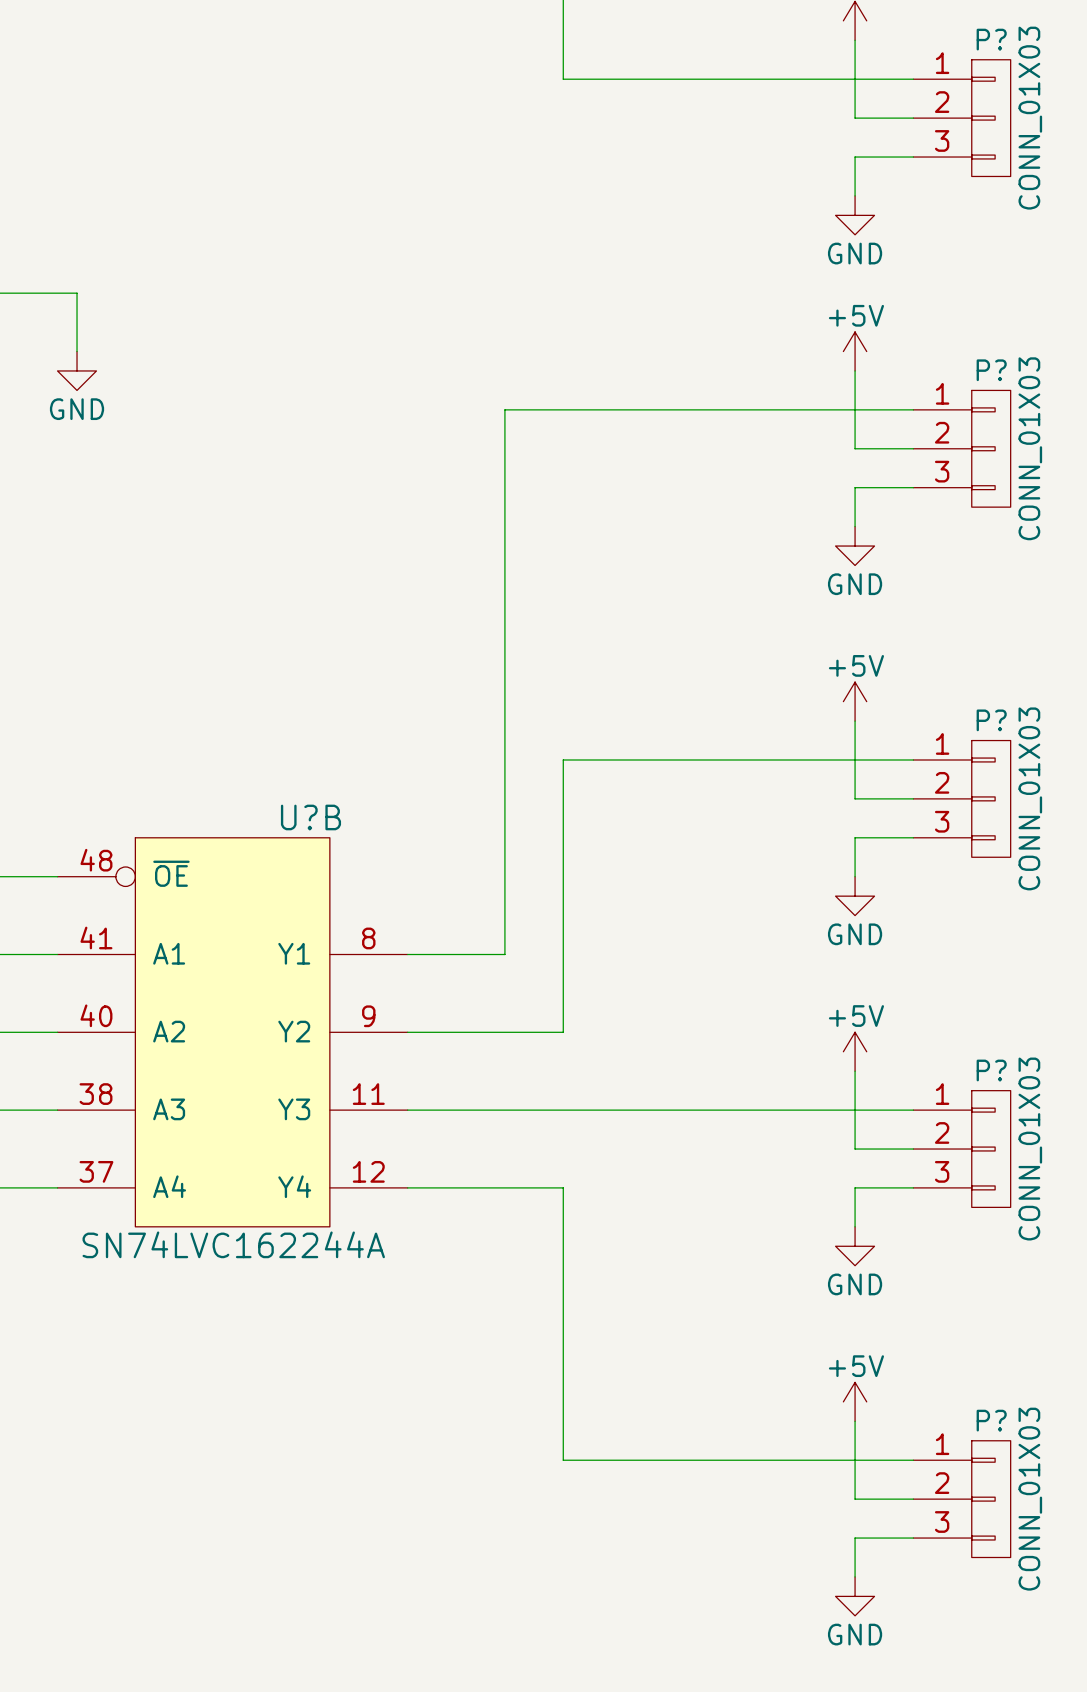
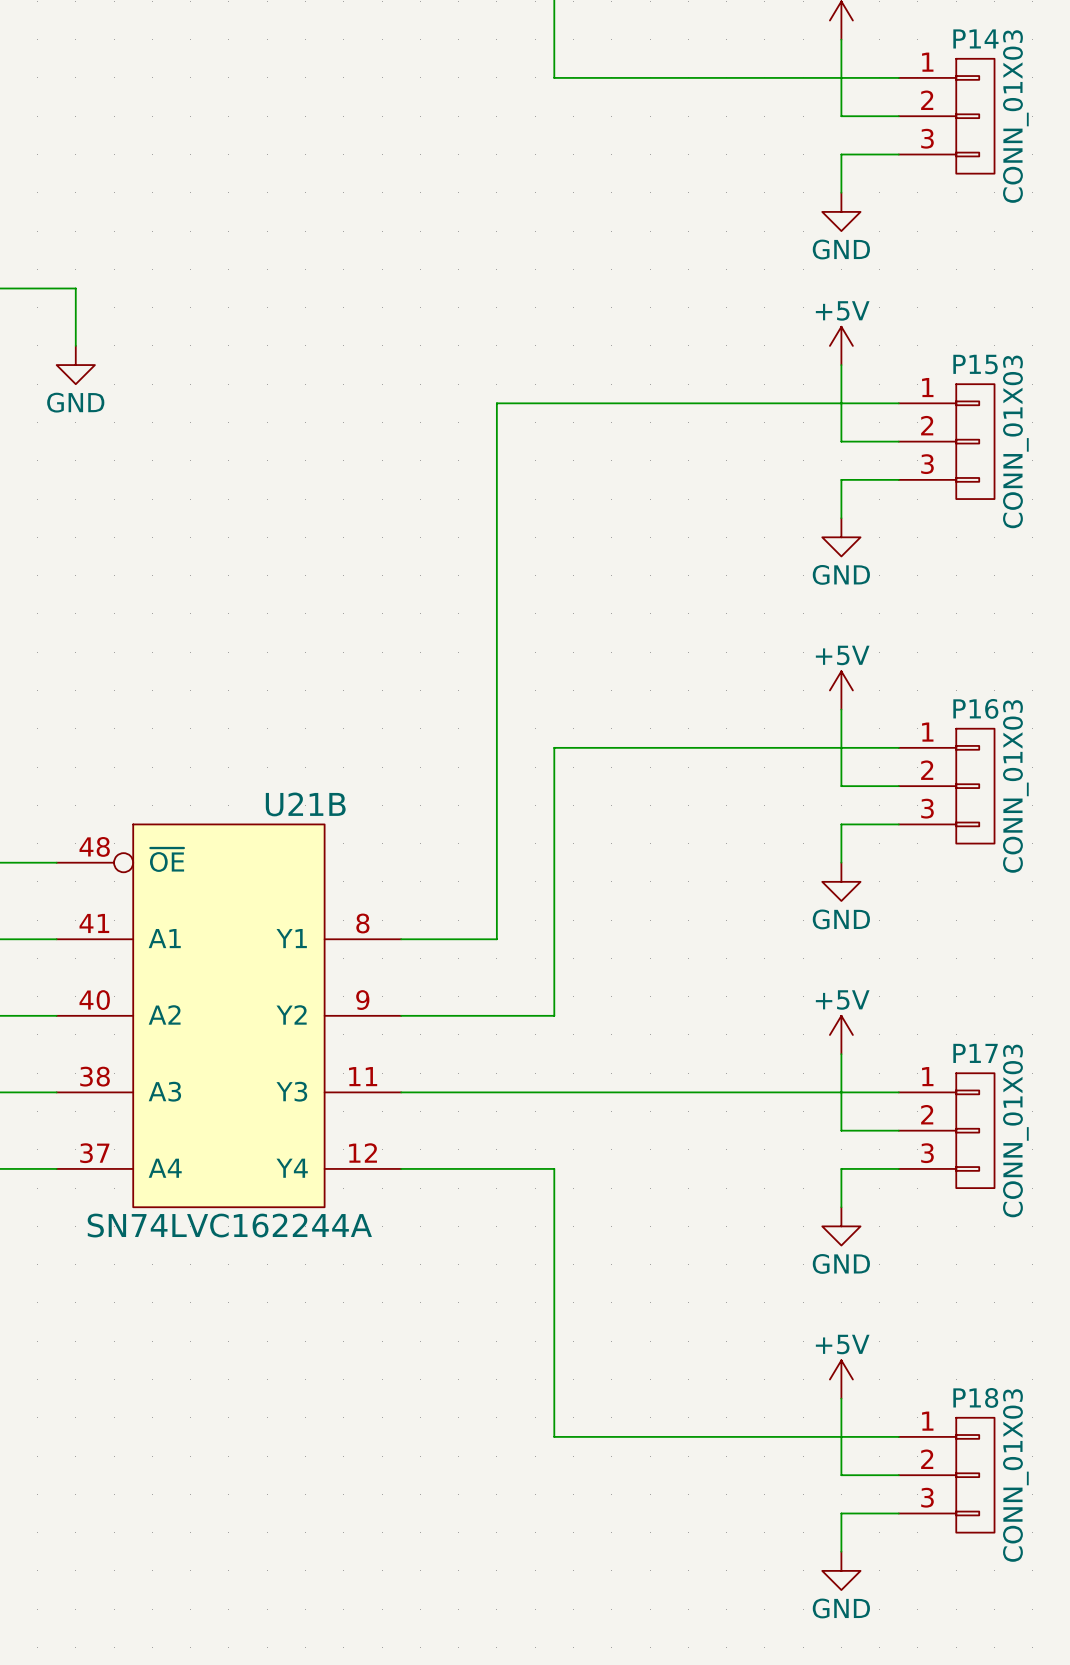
P? name: P? (991, 39) -> P14 (975, 38)
P? name: P? (991, 370) -> P15 (975, 364)
P? name: P? (991, 720) -> P16 (975, 708)
U?B name: U?B (310, 817) -> U21B (305, 804)
P? name: P? (991, 1070) -> P17 (975, 1053)
P? name: P? (991, 1420) -> P18 (975, 1397)

